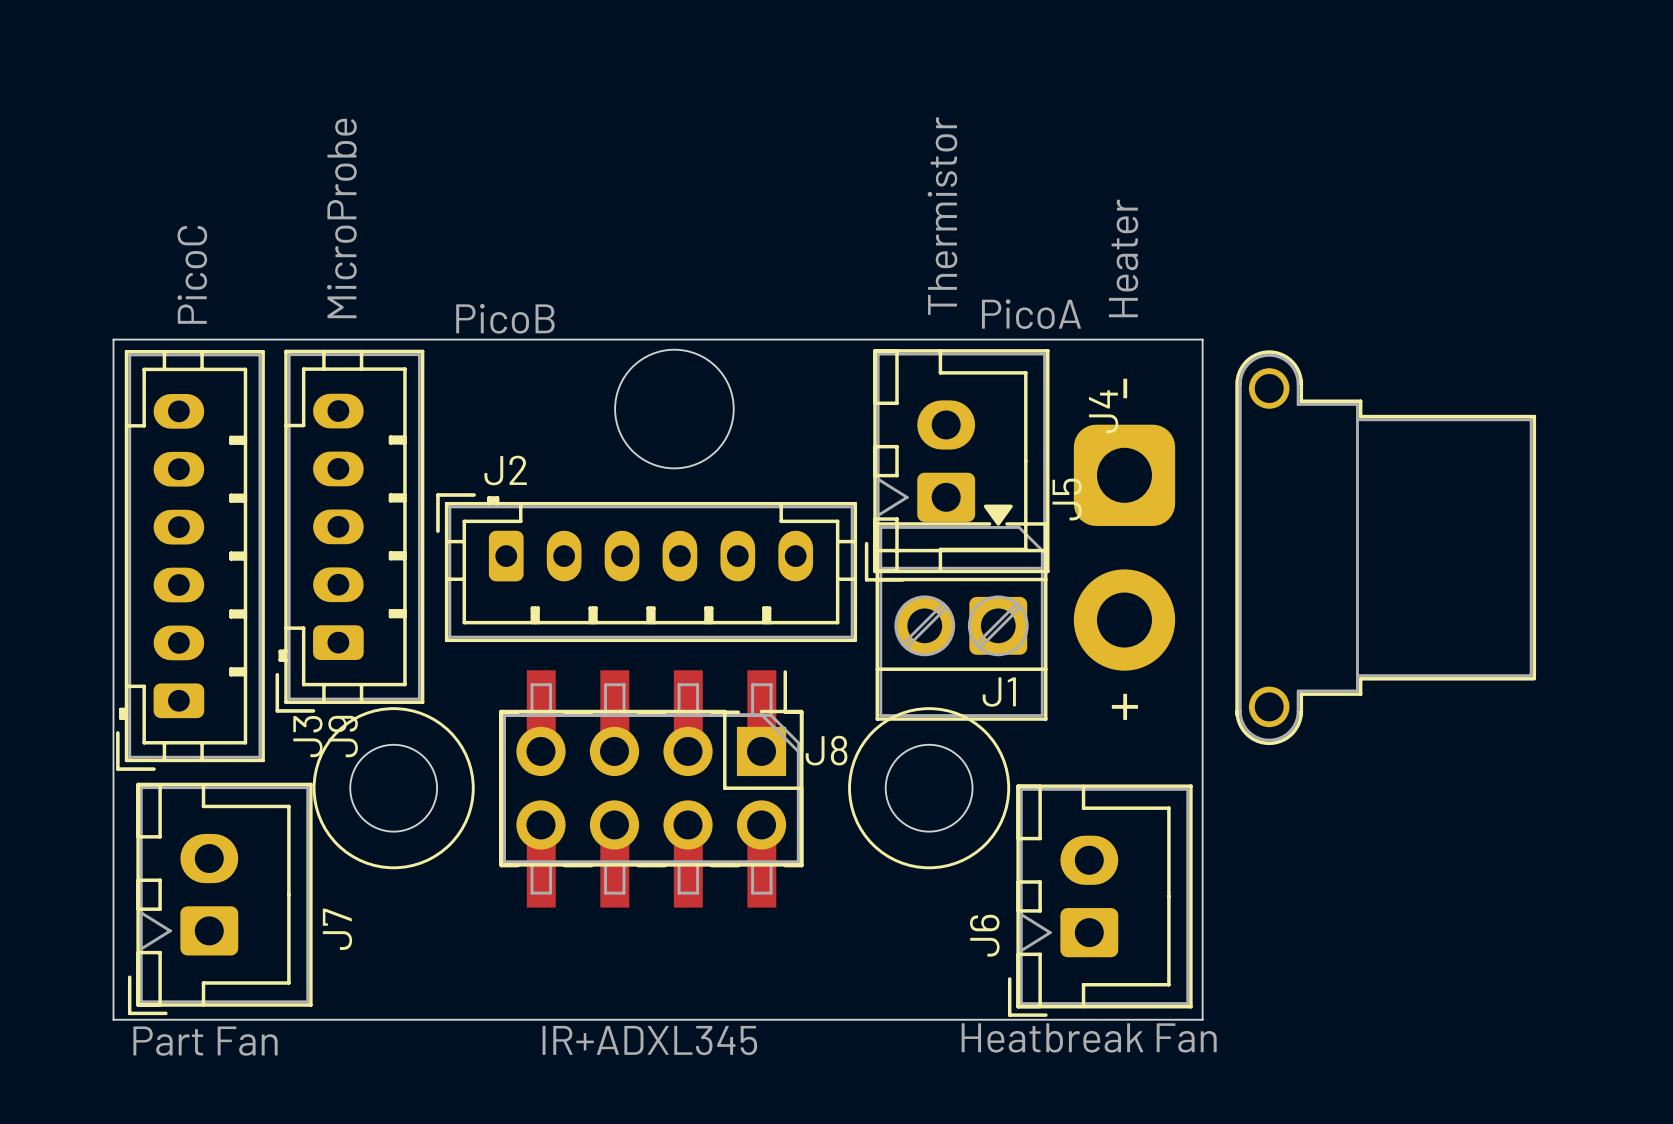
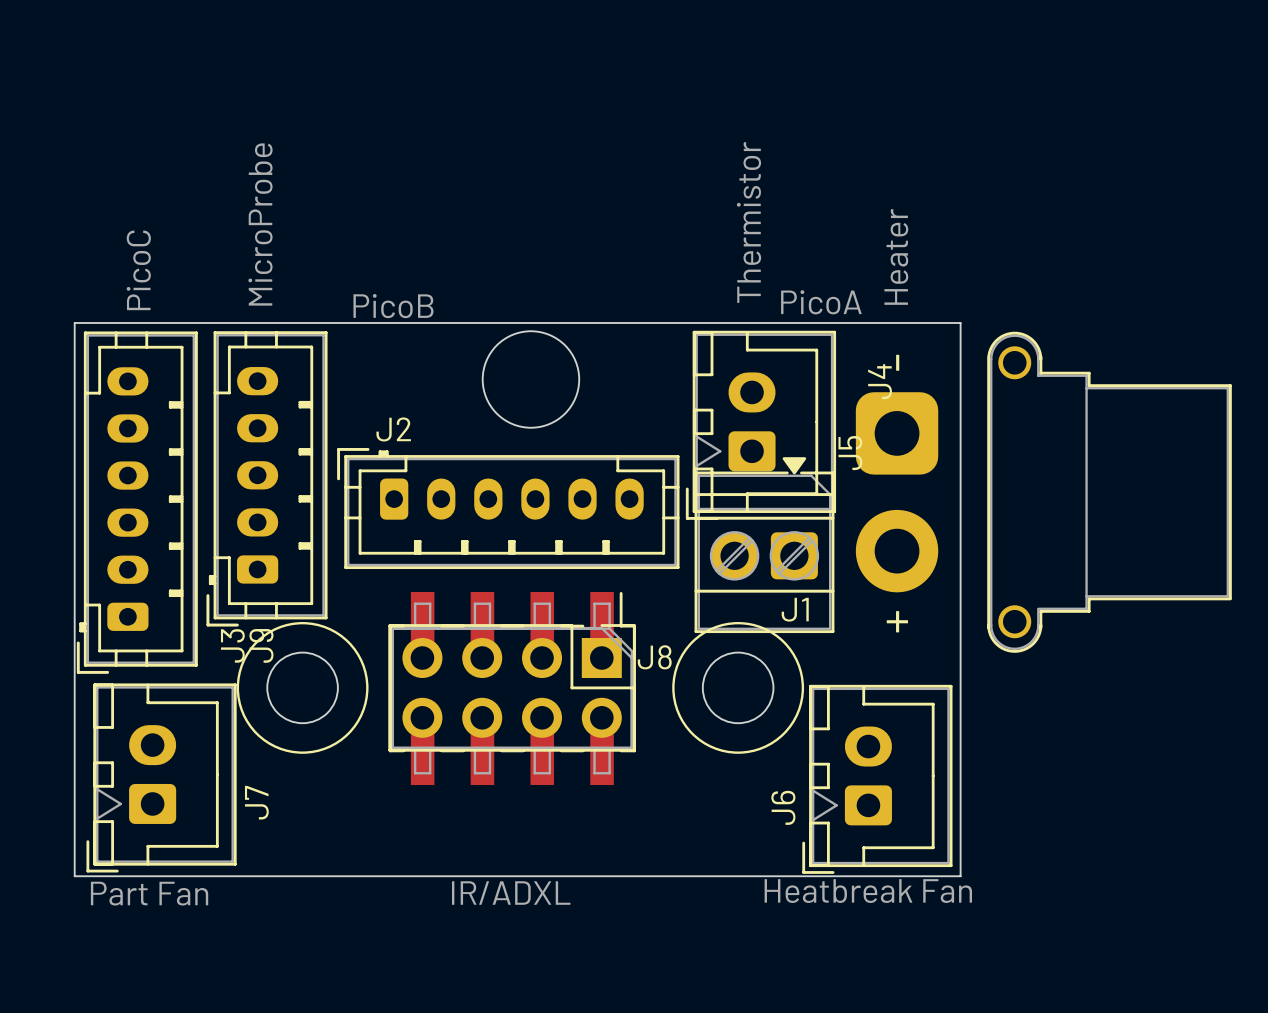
J8 value: IR+ADXL345 (649, 1040) -> IR/ADXL (511, 893)

